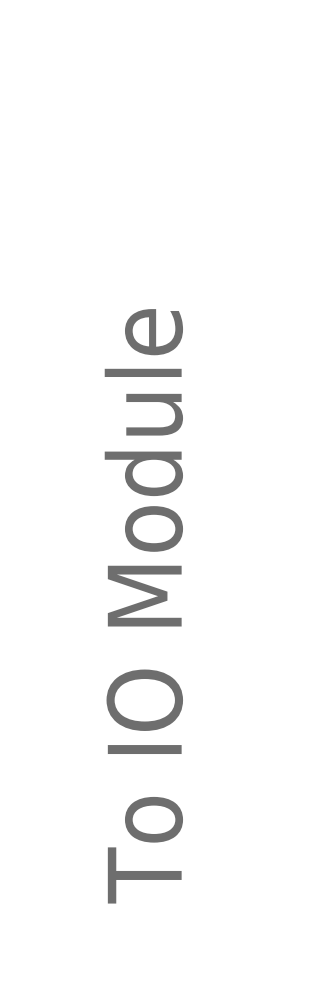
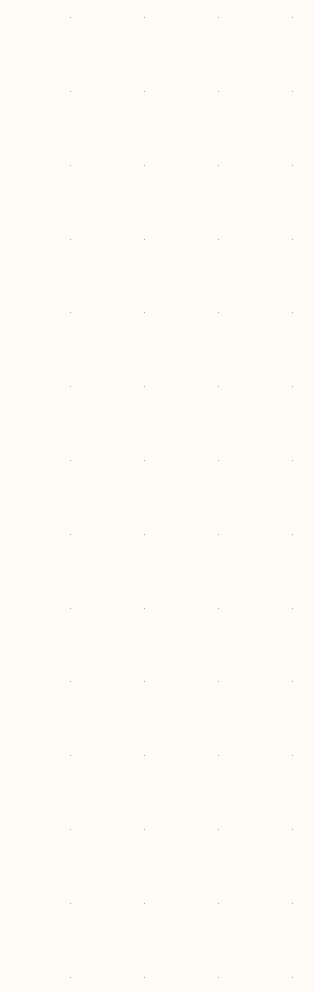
text: To IO Module (143, 606) -> none

